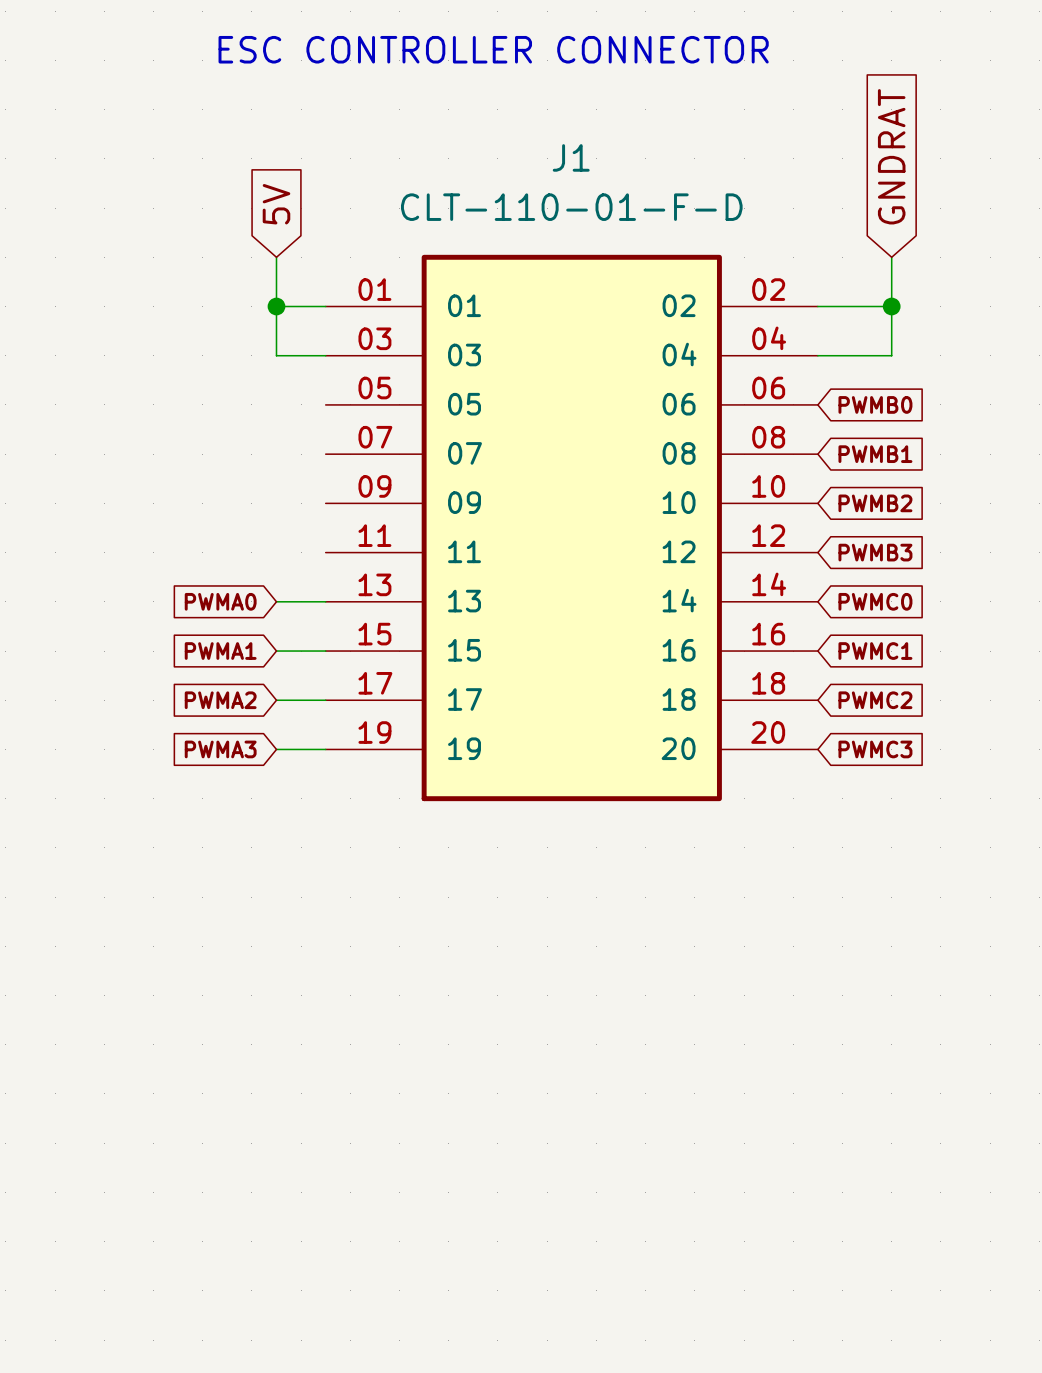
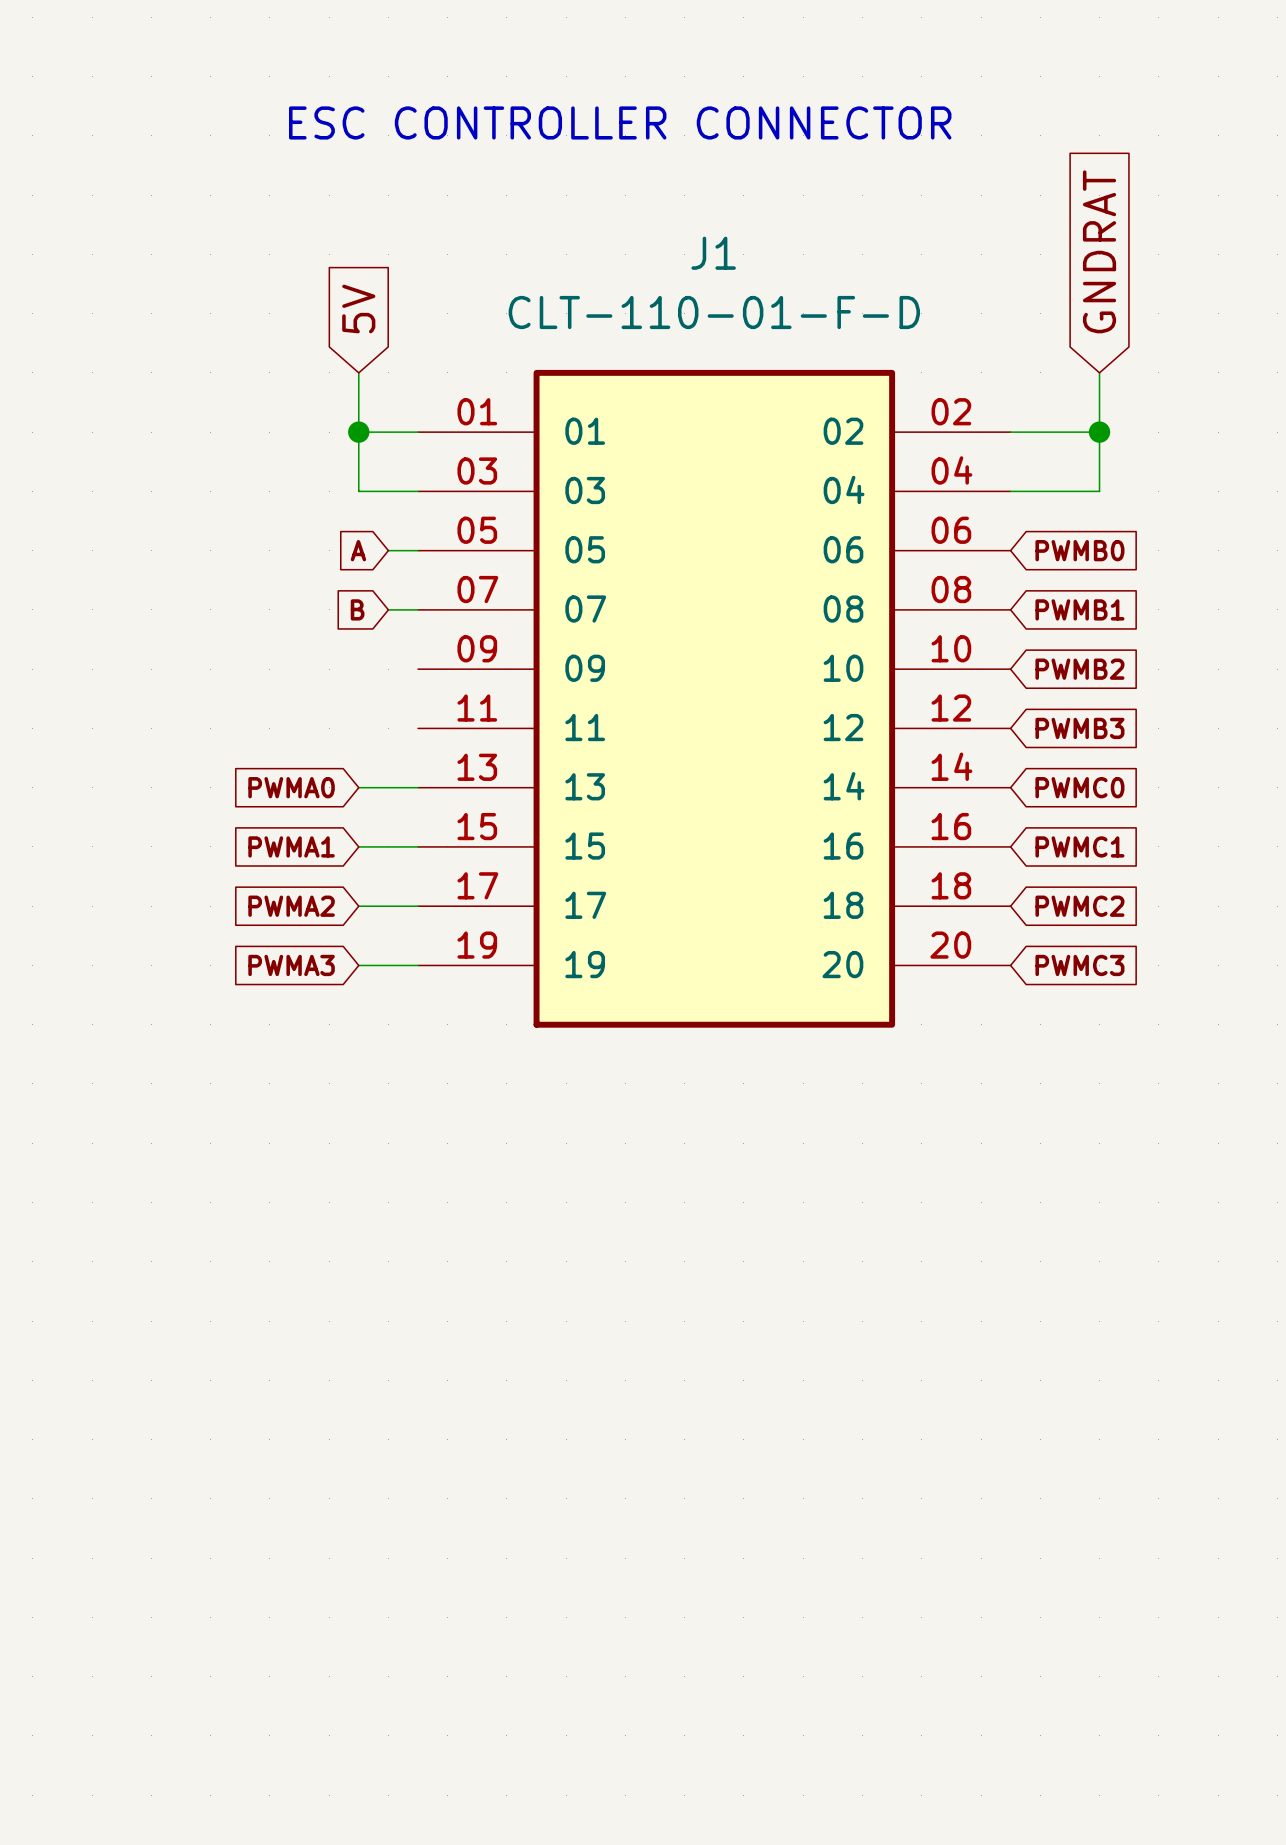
global label: none -> A (358, 550)
wire: none -> (388, 550) (418, 550)
global label: none -> B (357, 609)
wire: none -> (388, 609) (418, 609)

